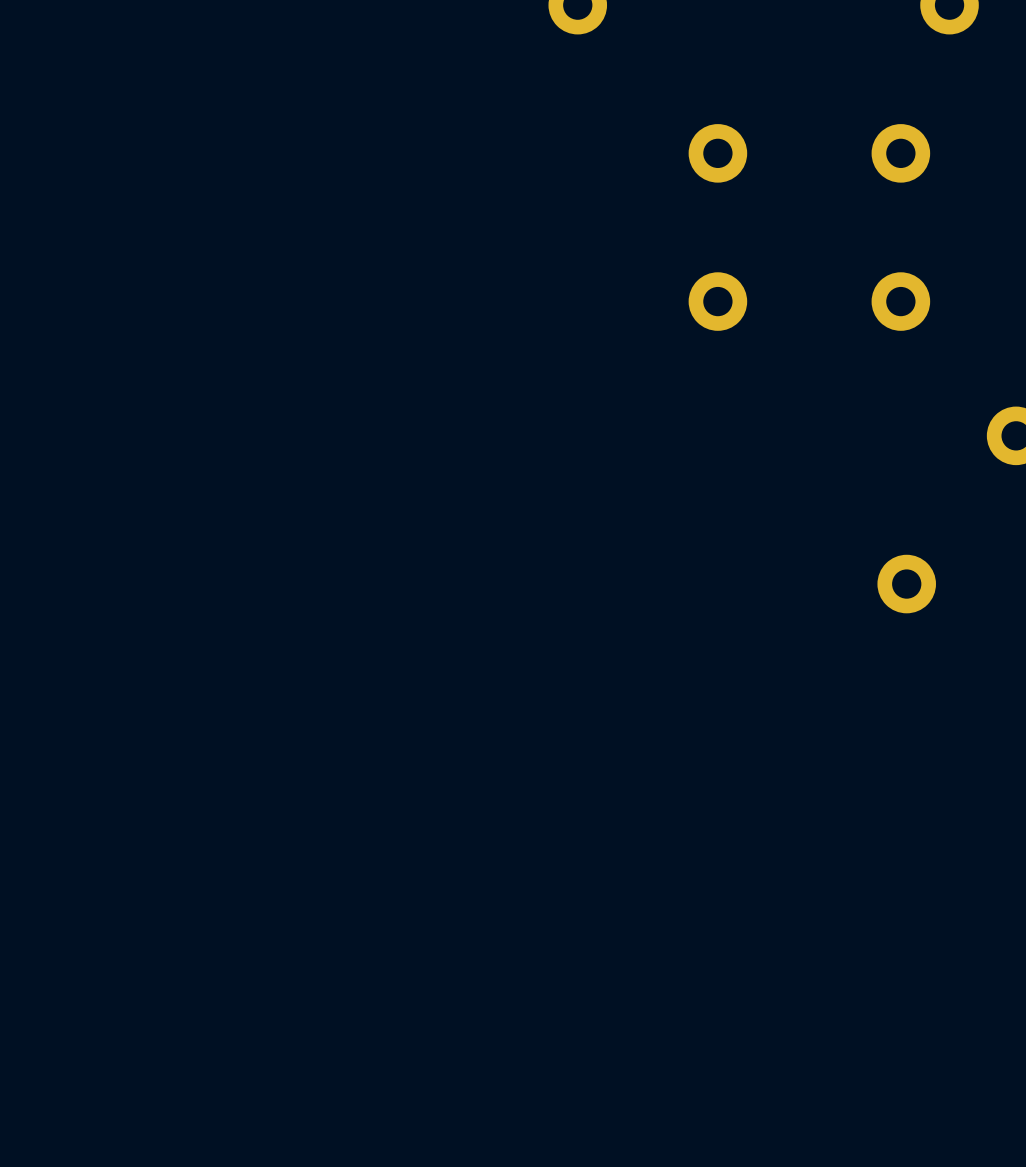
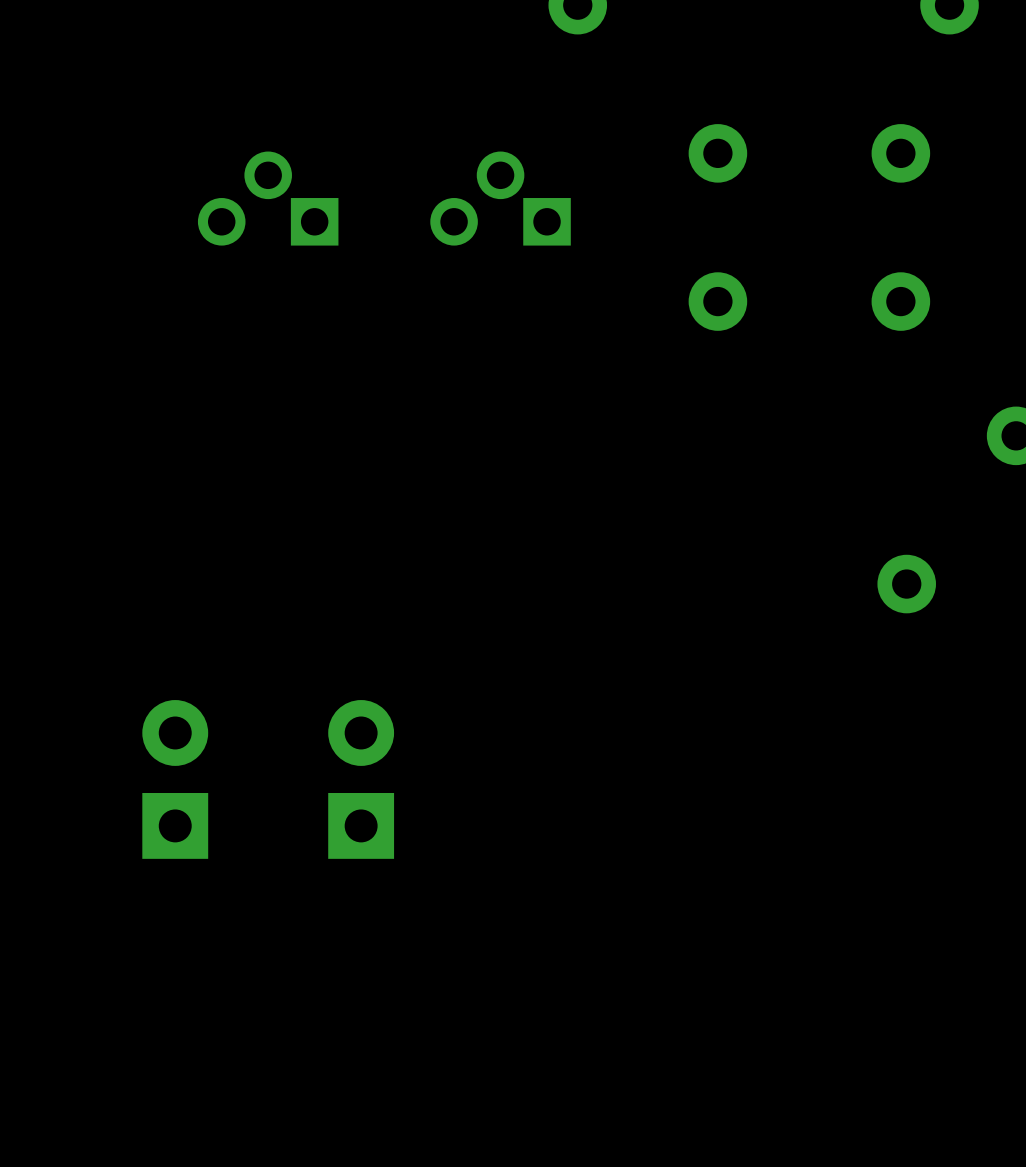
part: none -> (268, 198)
part: none -> (500, 198)
part: none -> (175, 779)
part: none -> (361, 779)

